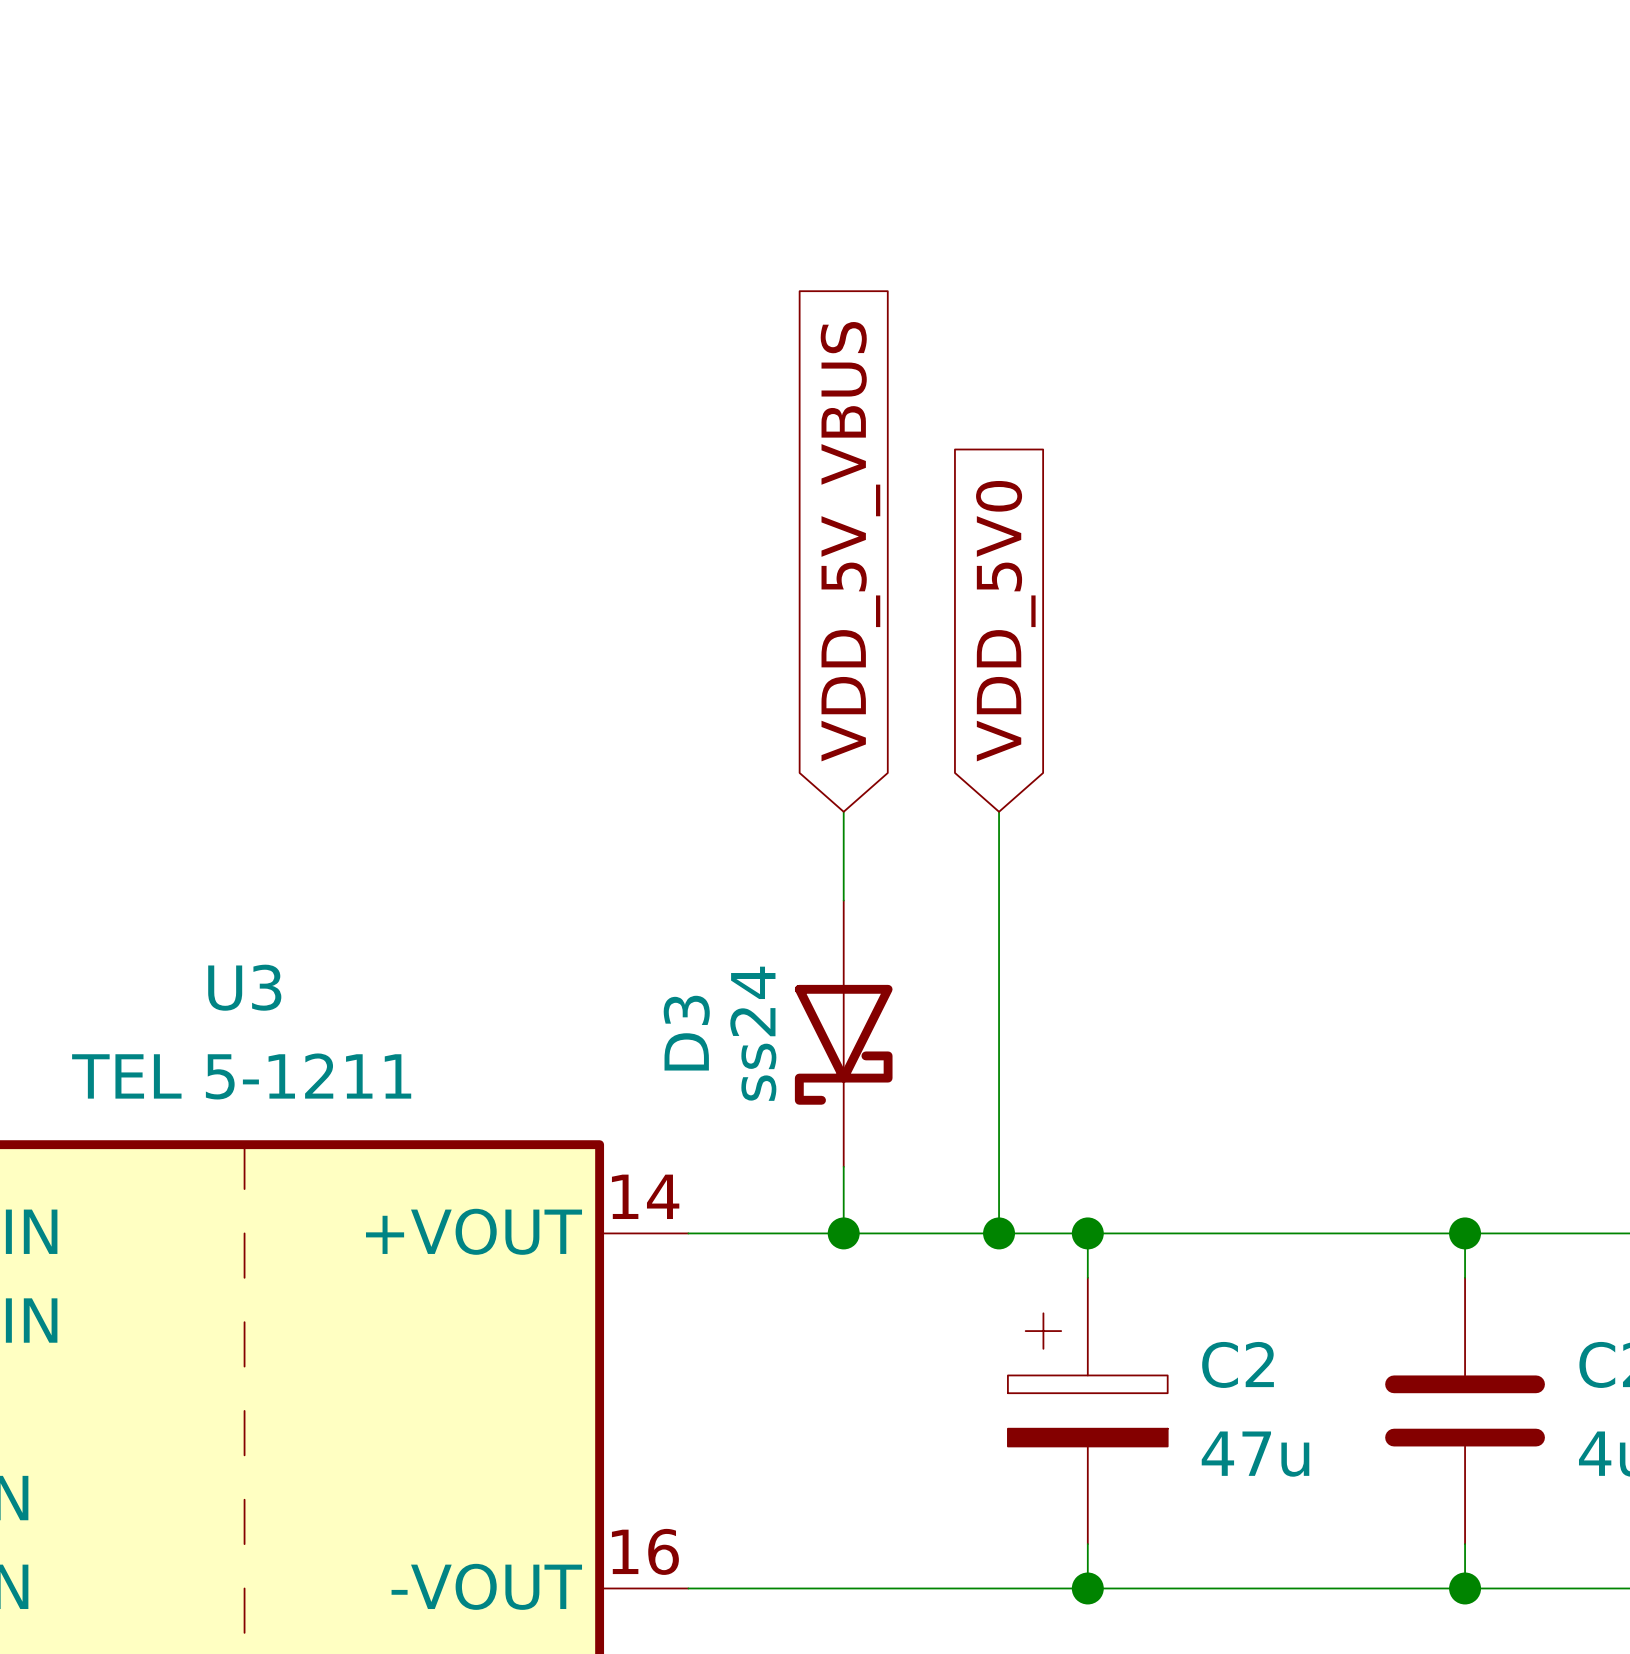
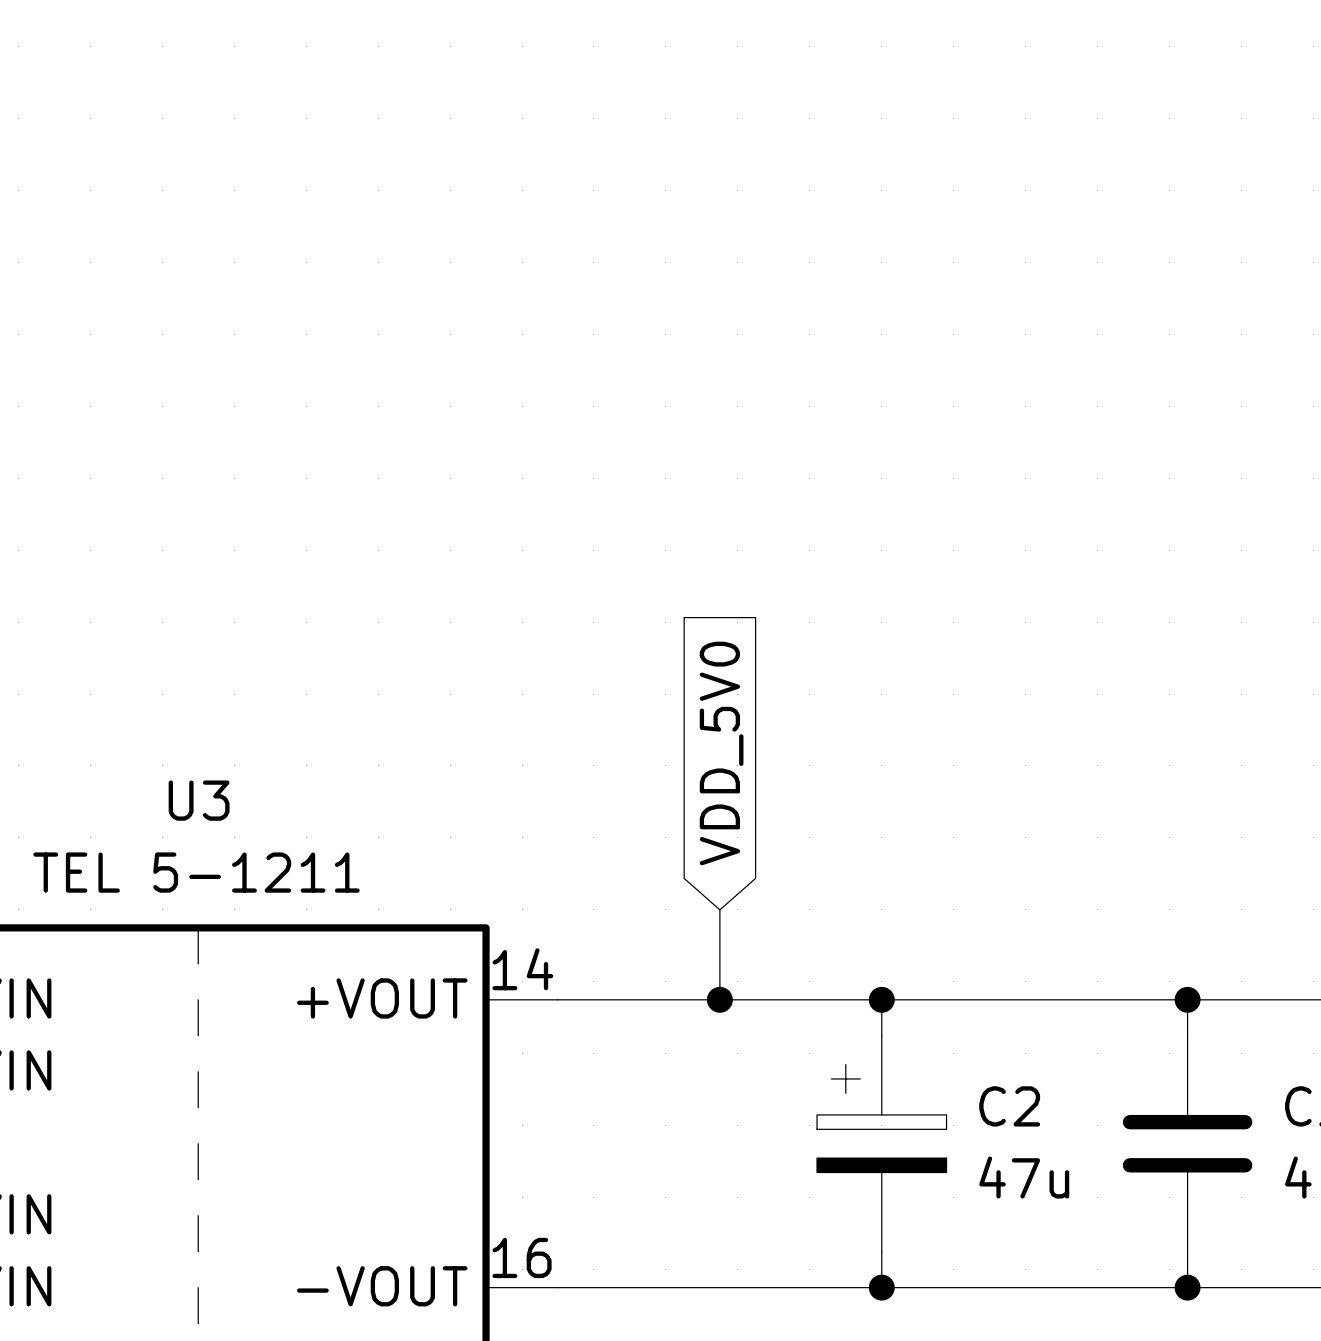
global label: VDD_5V_VBUS (850, 541) -> none
global label position: VDD_5V0 (1005, 621) -> VDD_5V0 (721, 753)
wire: (999, 811) (999, 1233) -> none
D3: ss24 (843, 1033) -> none
wire: none -> (719, 909) (719, 999)
wire: (843, 1166) (843, 1233) -> none
junction position: (843, 1233) -> (719, 999)
junction: (999, 1233) -> none

